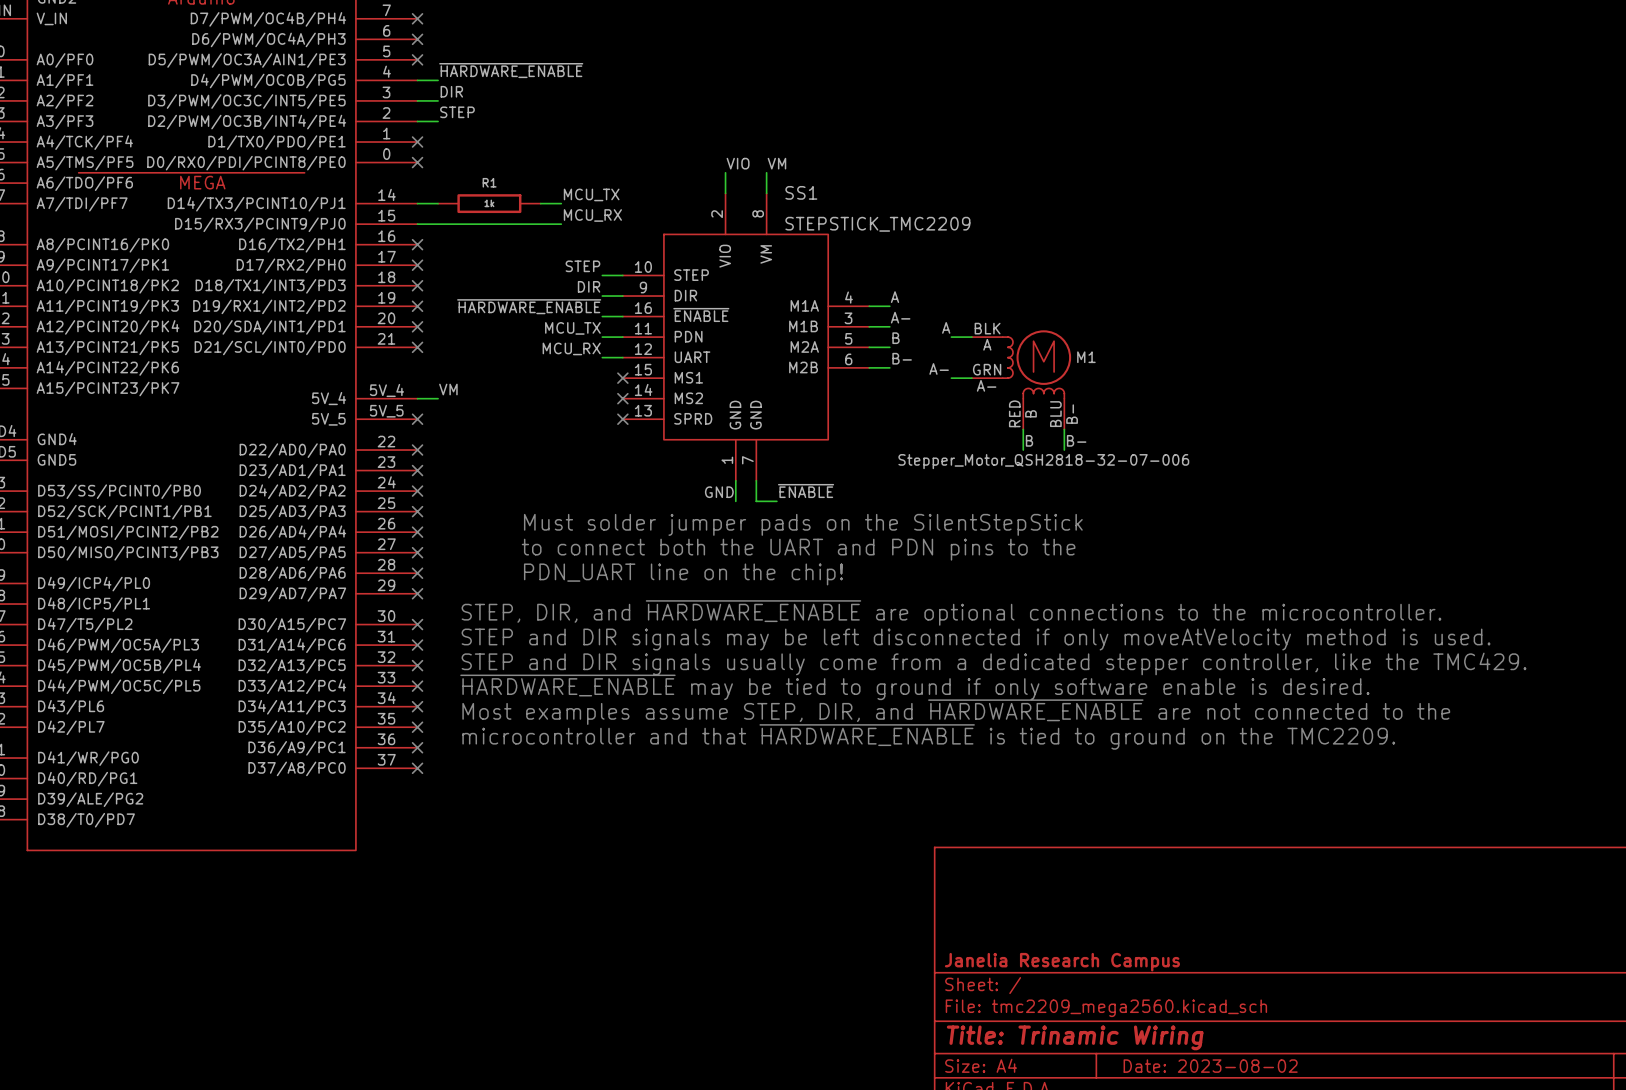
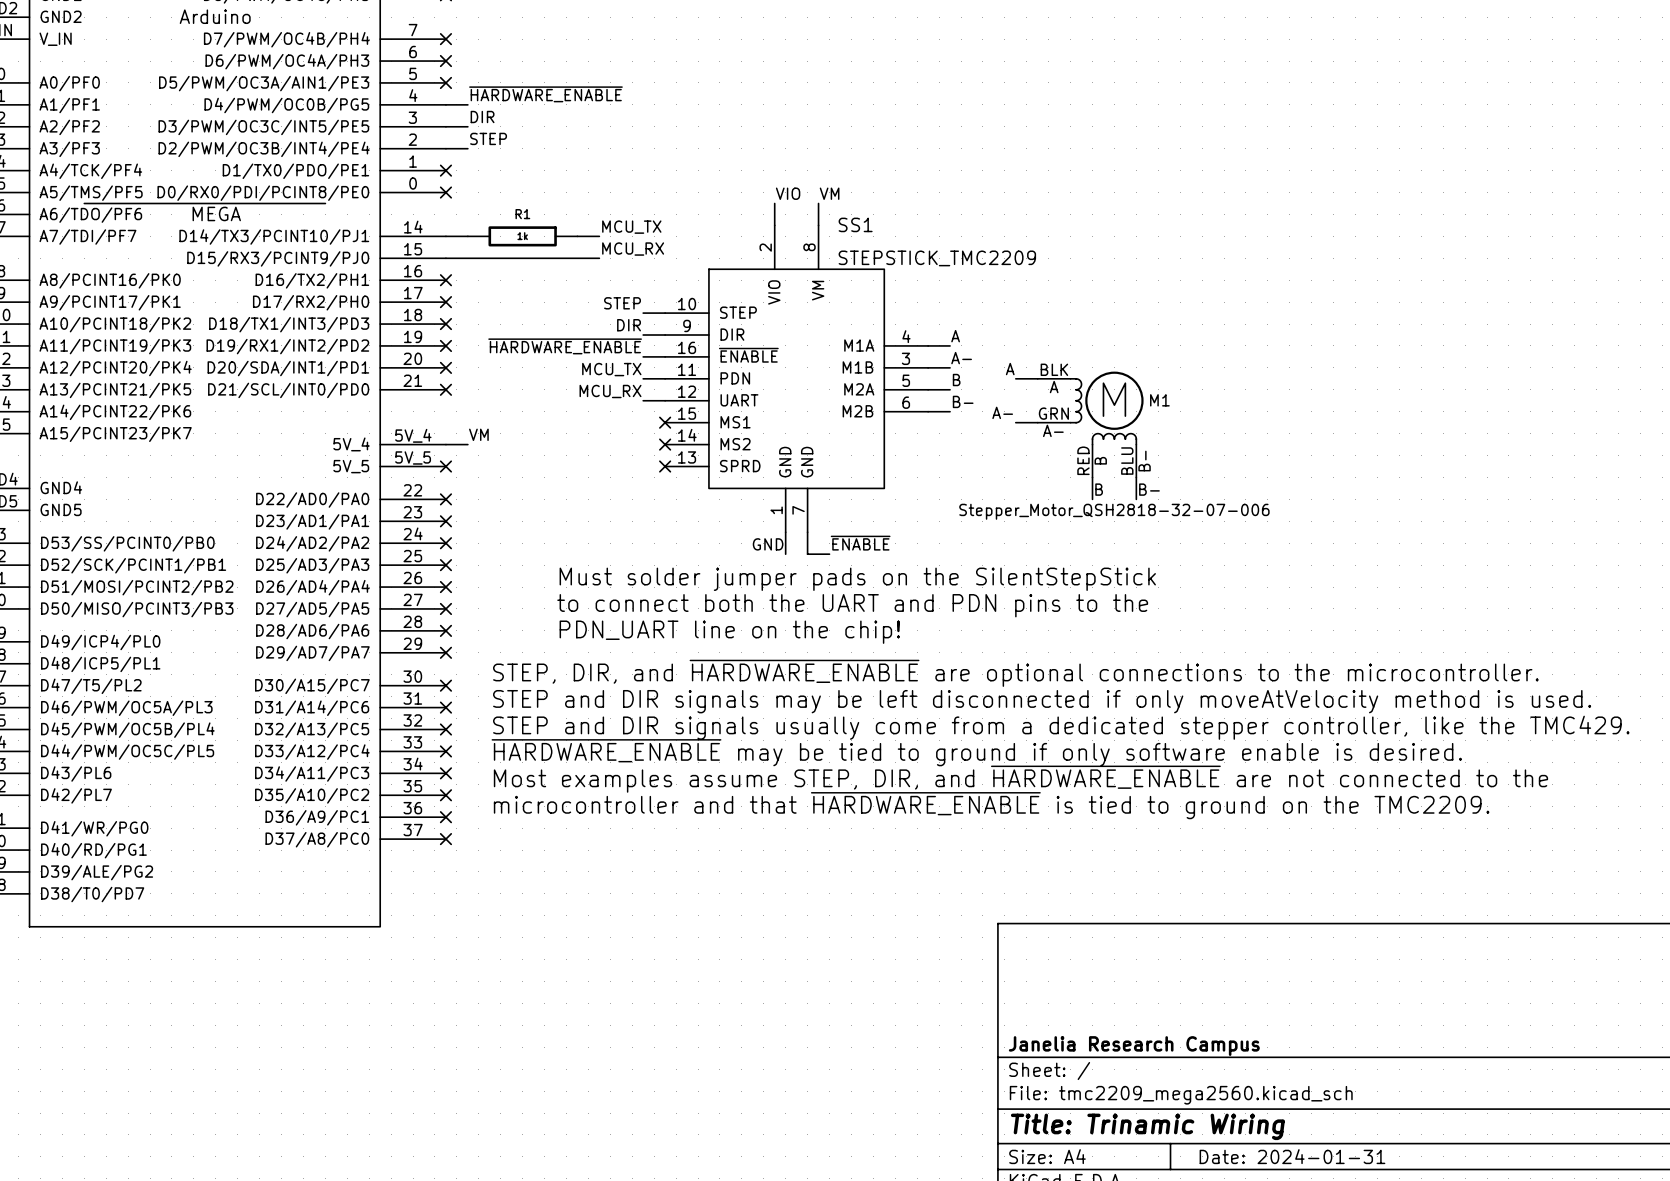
title block: Date: 2023-08-02 (1210, 1066) -> Date: 2024-01-31 (1292, 1156)

